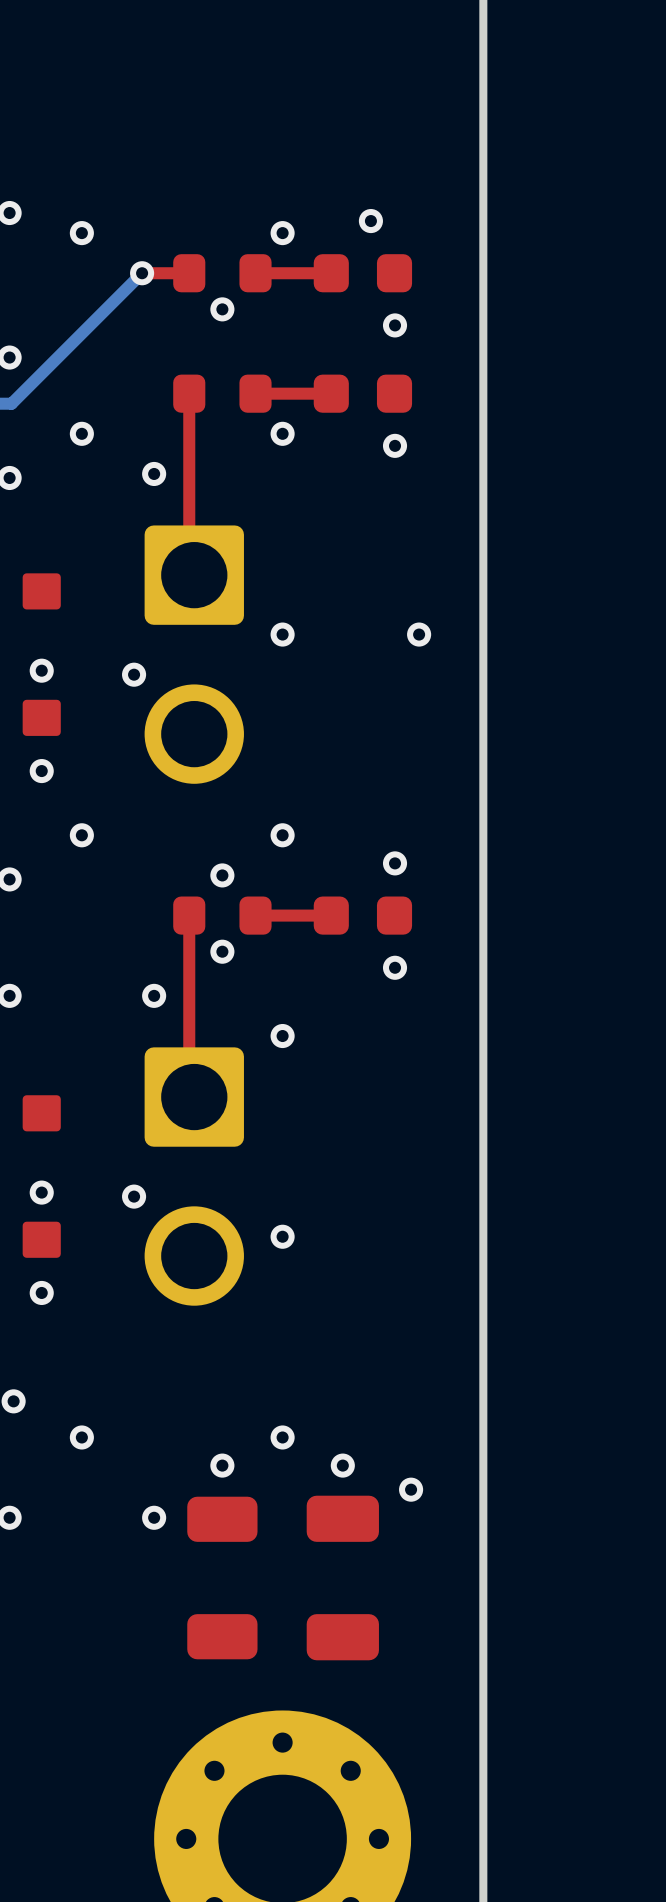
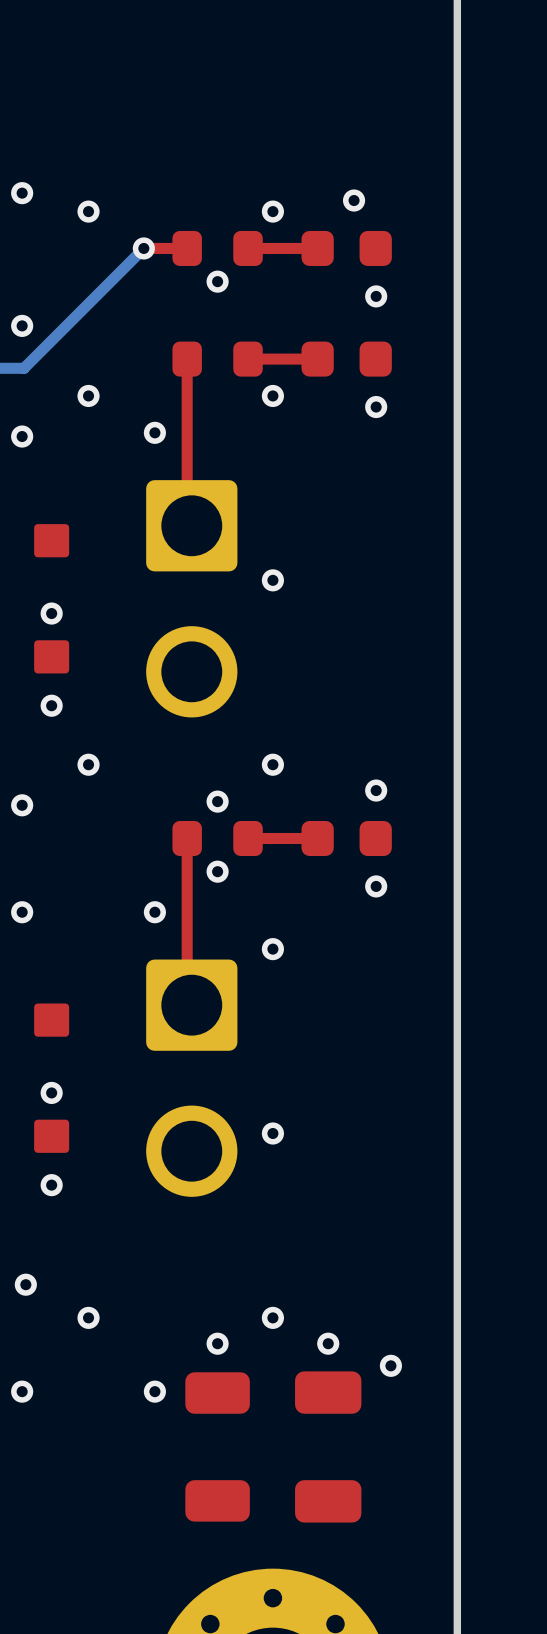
via: (419, 634) -> none
via: (134, 674) -> none
via: (134, 1196) -> none

